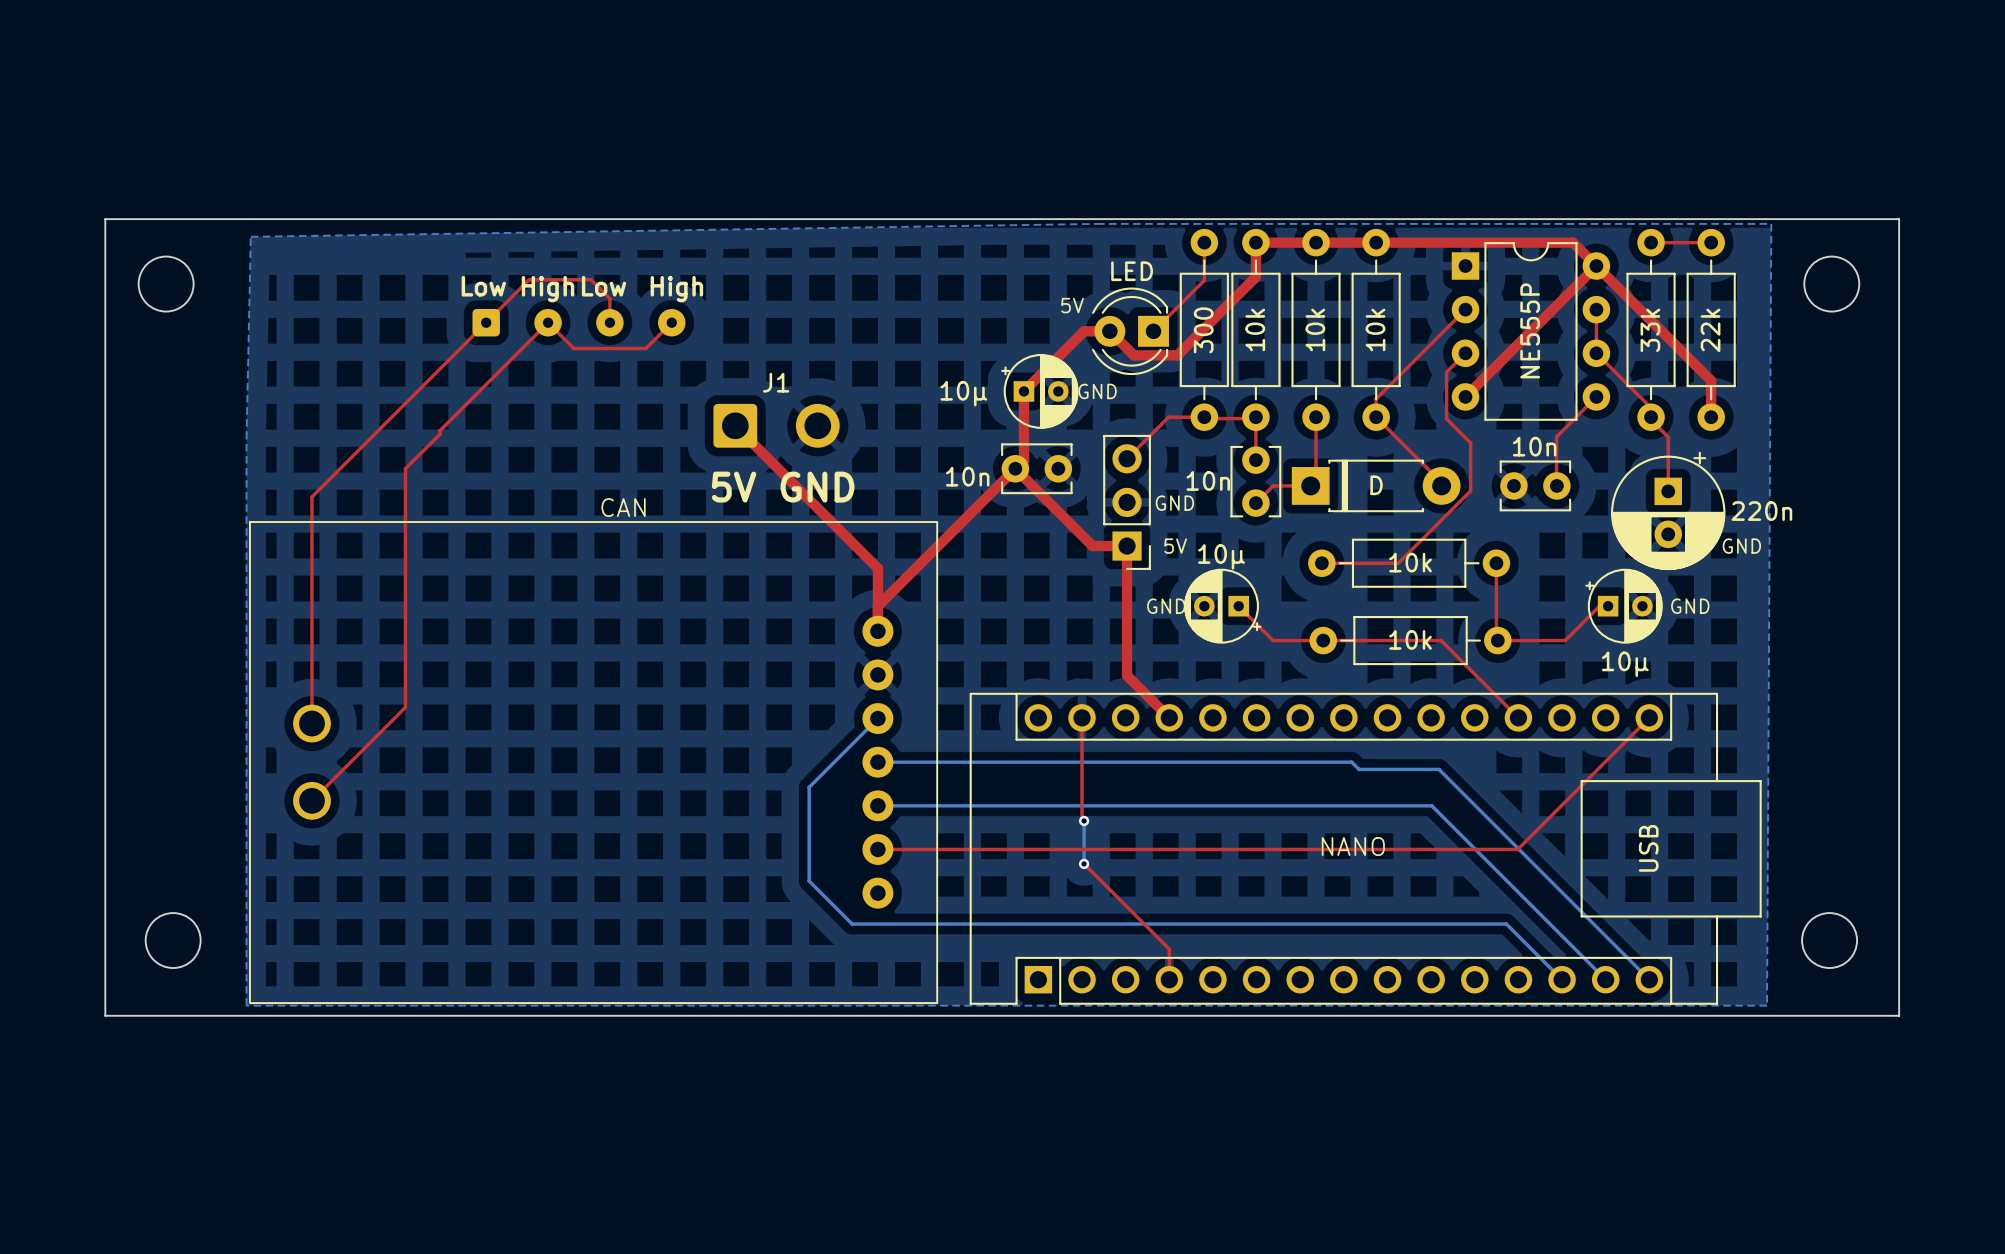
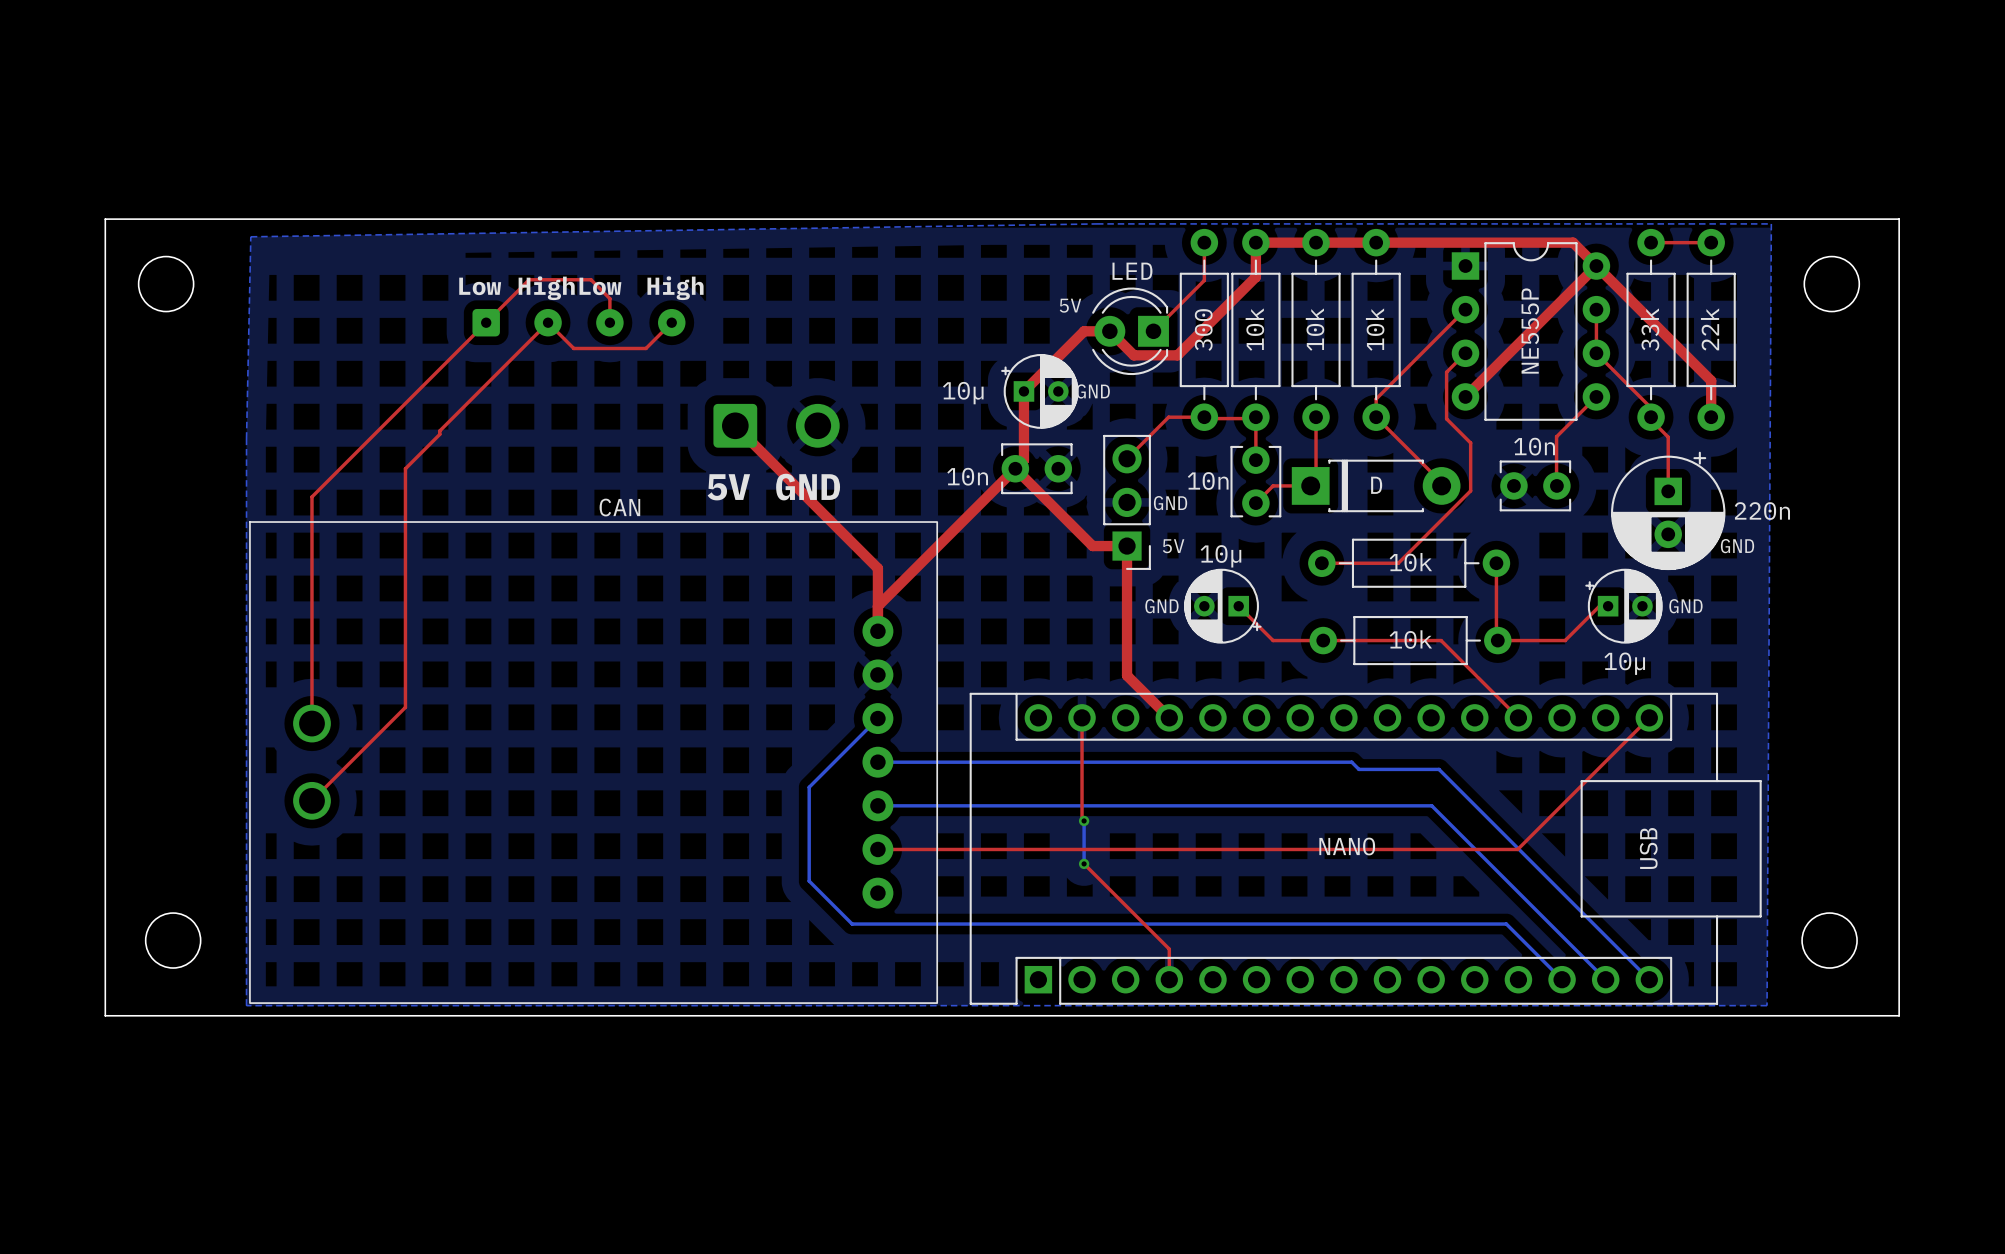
J1 name: J1 (776, 382) -> none

